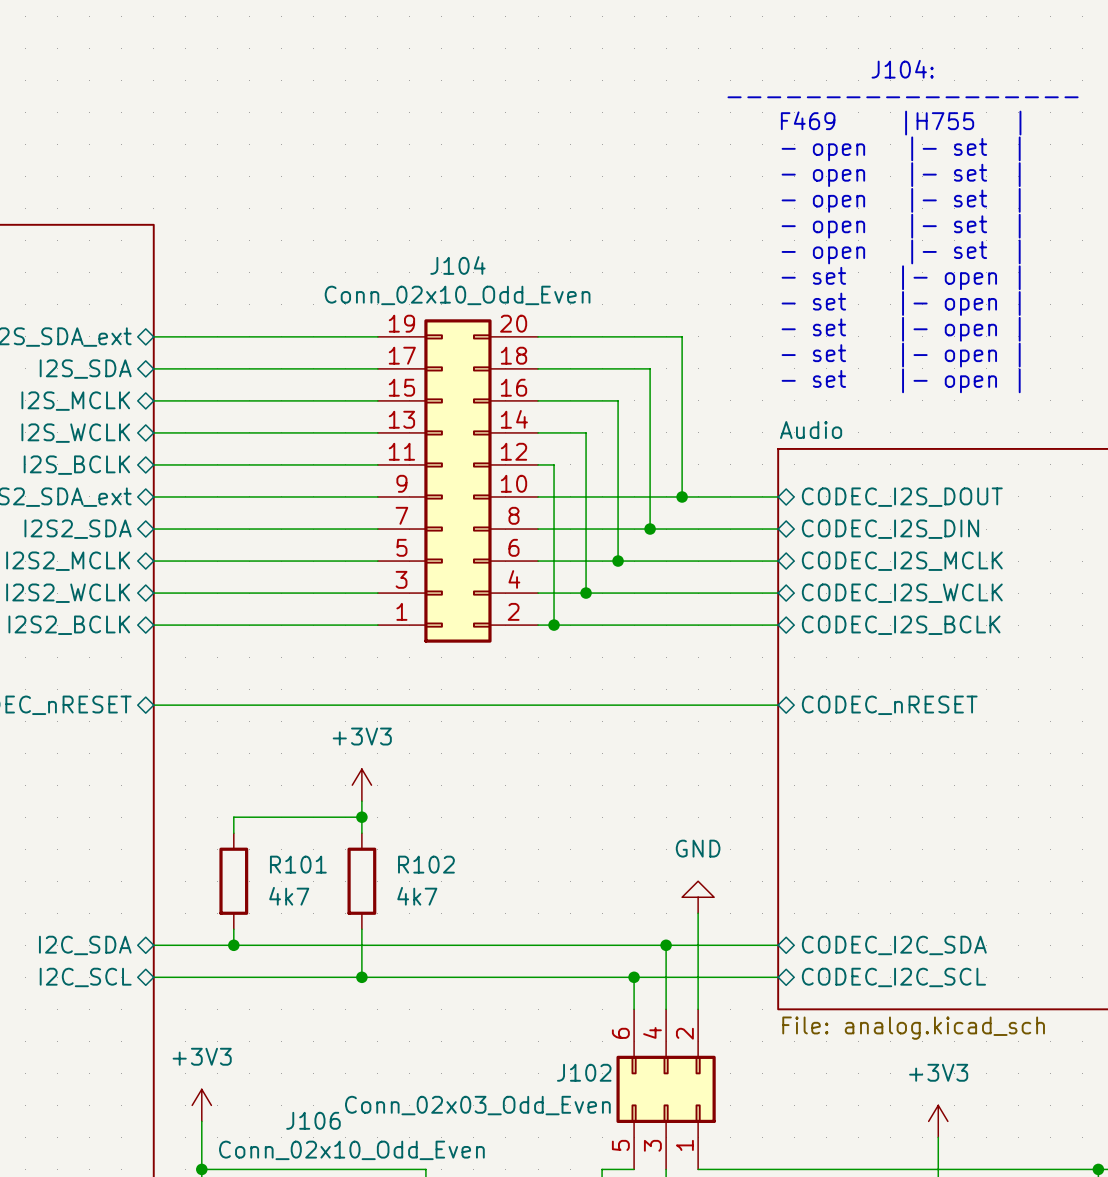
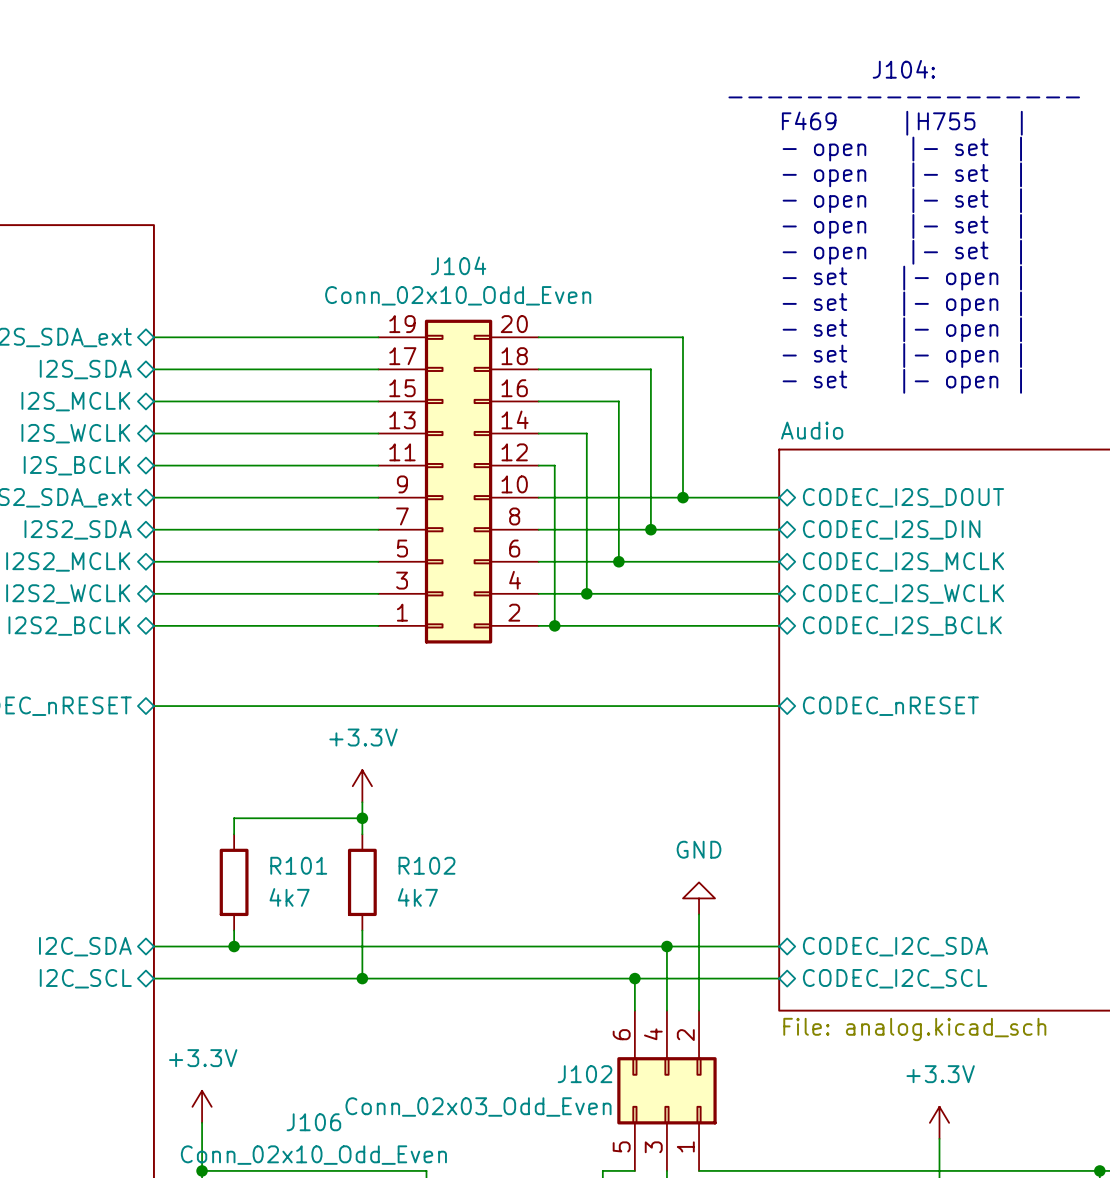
power symbol: +3V3 (361, 785) -> +3.3V (362, 786)
power symbol: +3V3 (201, 1105) -> +3.3V (202, 1106)
power symbol: +3V3 (938, 1121) -> +3.3V (939, 1122)
J106 value position: Conn_02x10_Odd_Even (351, 1150) -> Conn_02x10_Odd_Even (313, 1155)

